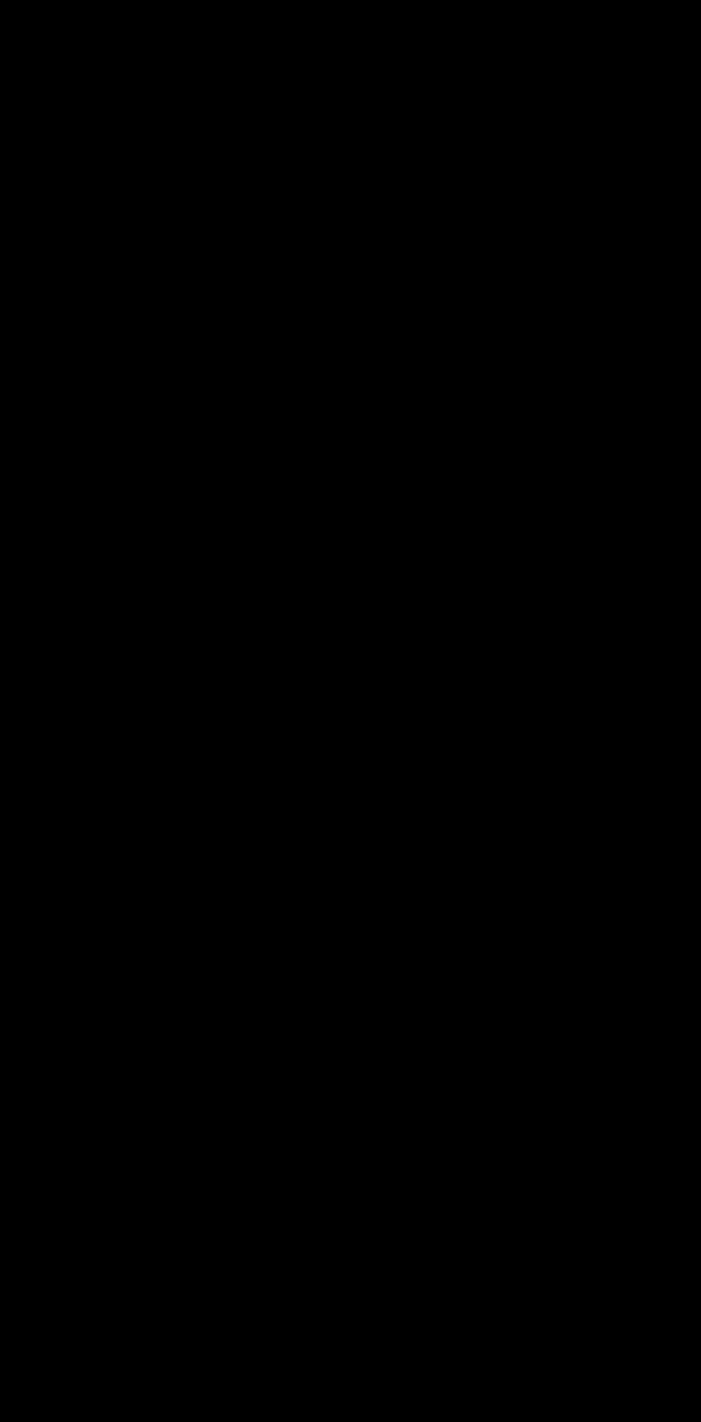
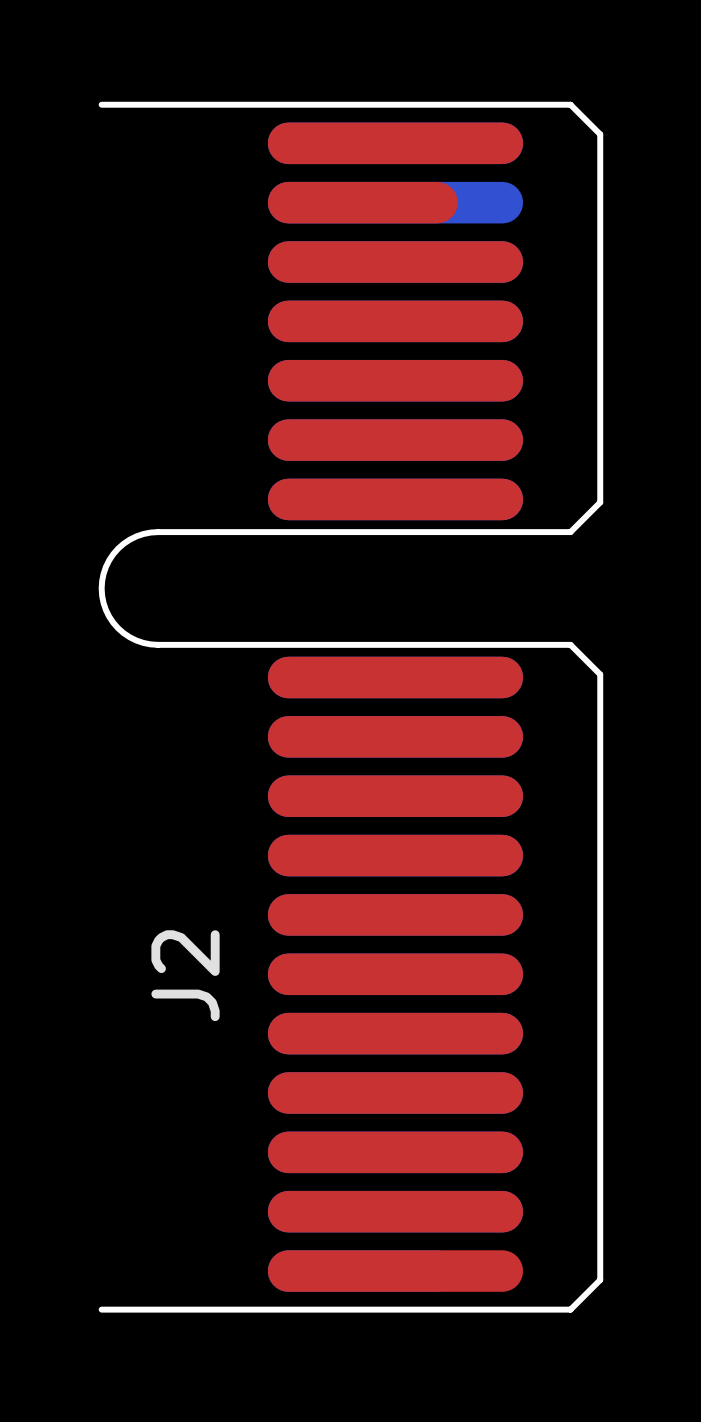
J2: none -> (350, 707)

